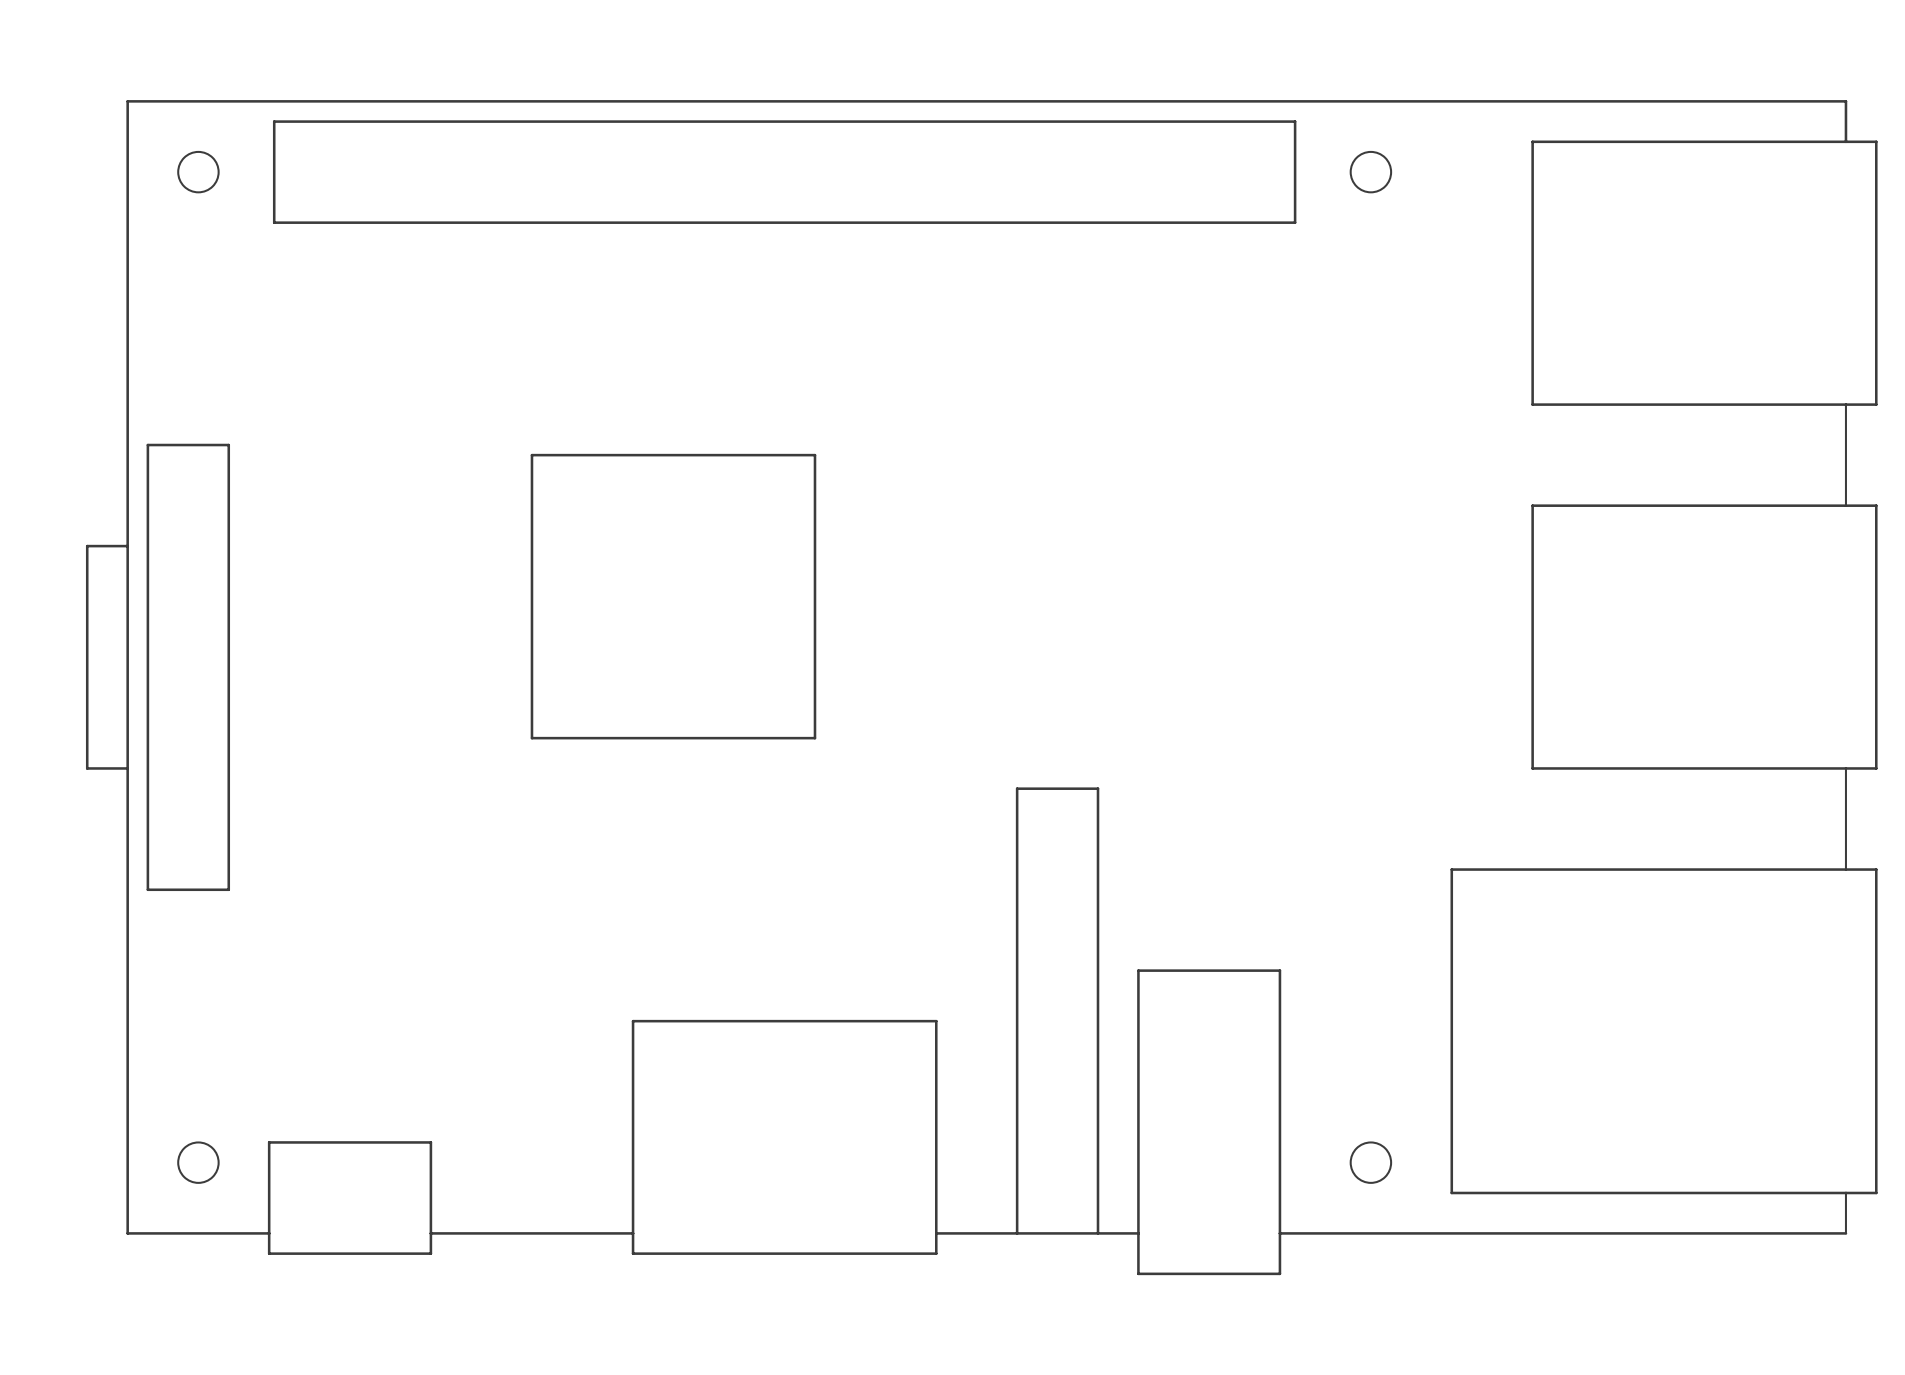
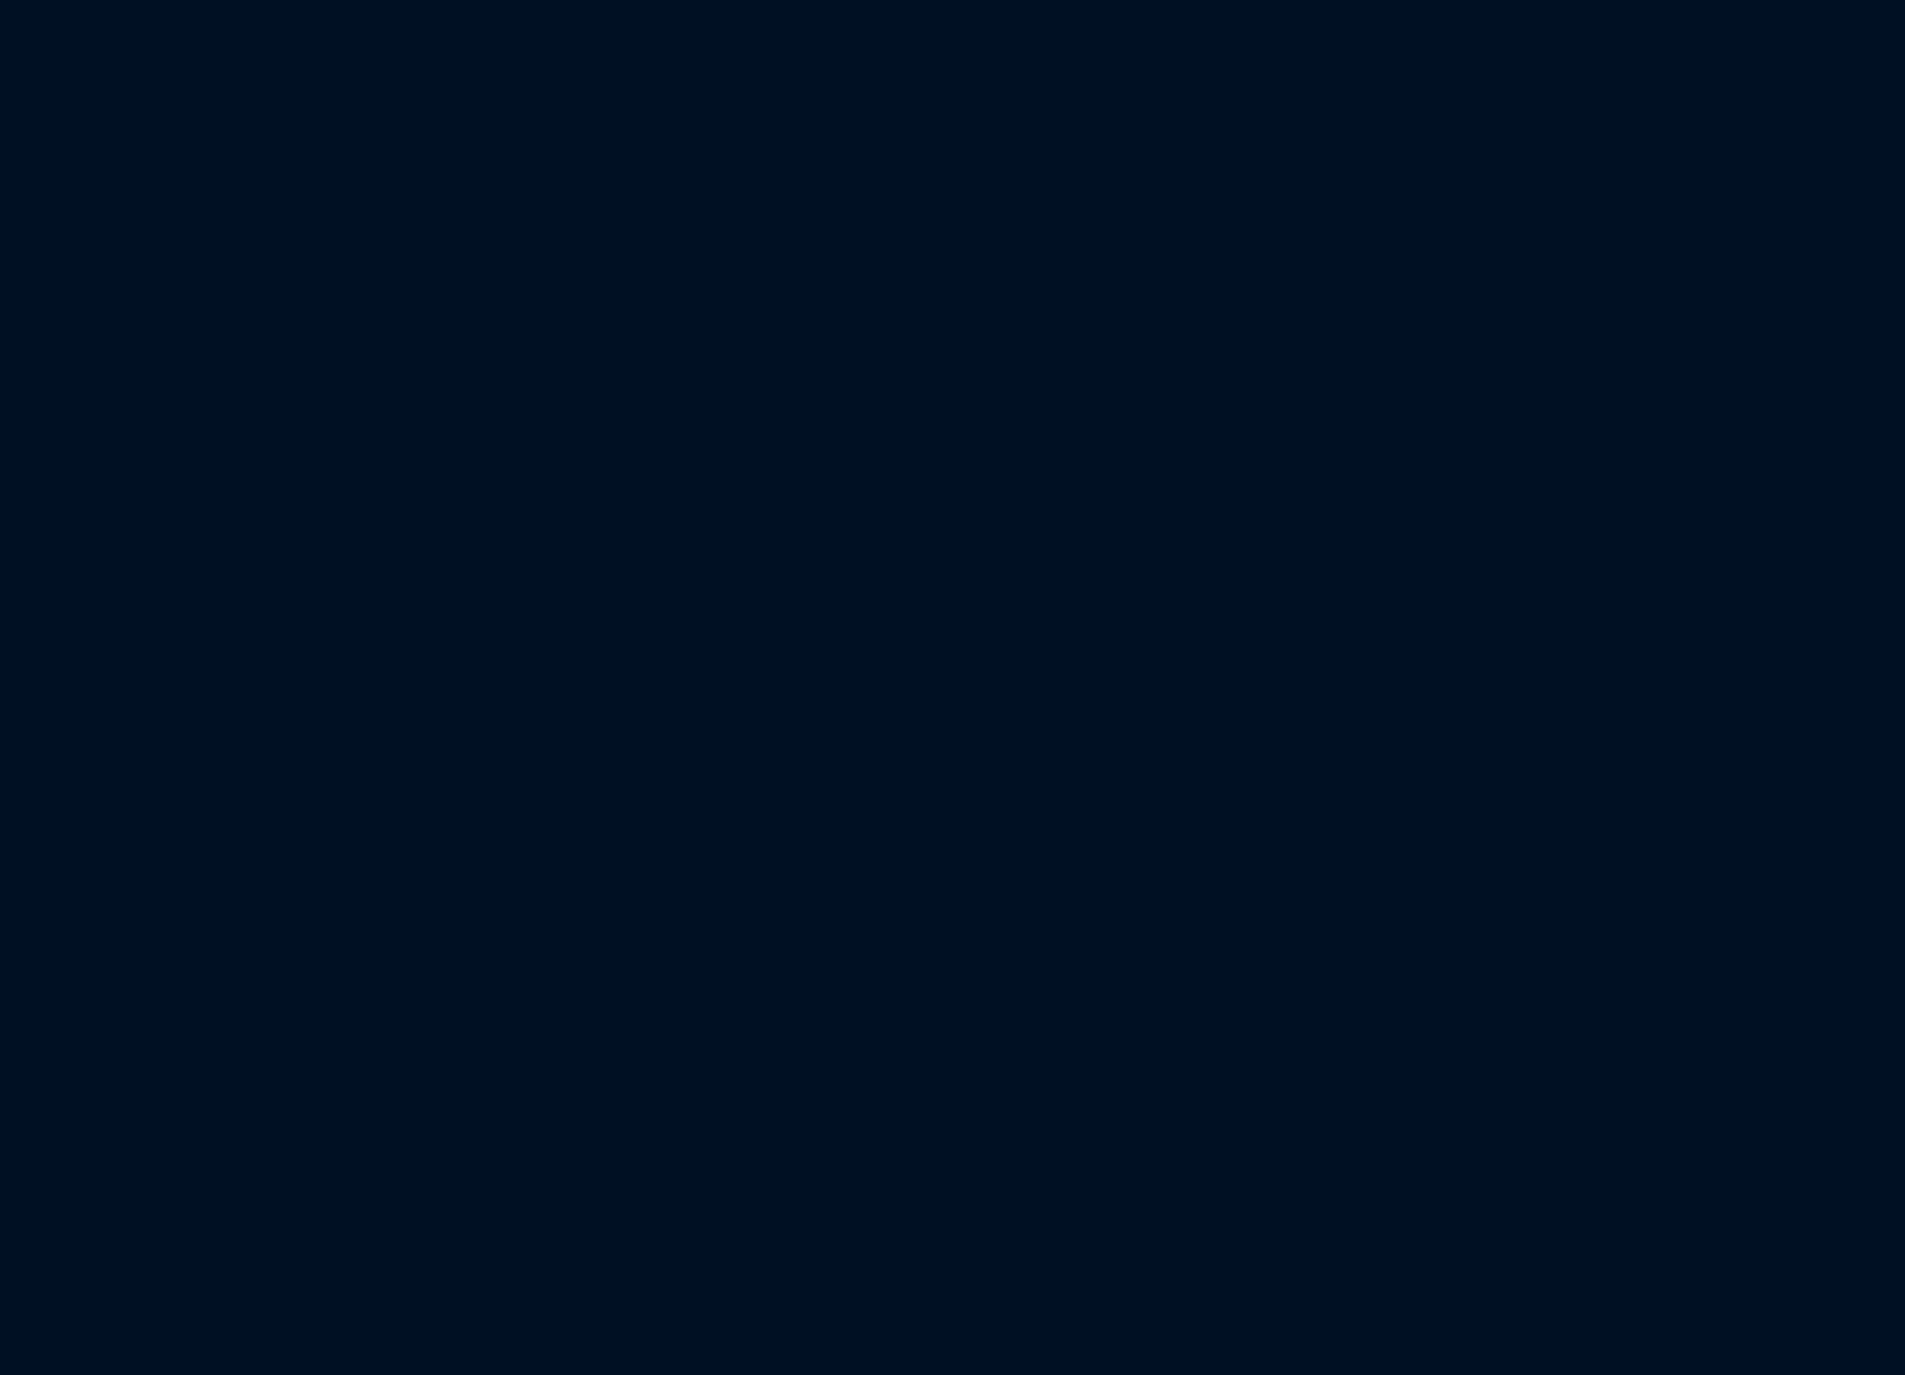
drawing: [85, 100, 1878, 1276] -> none

